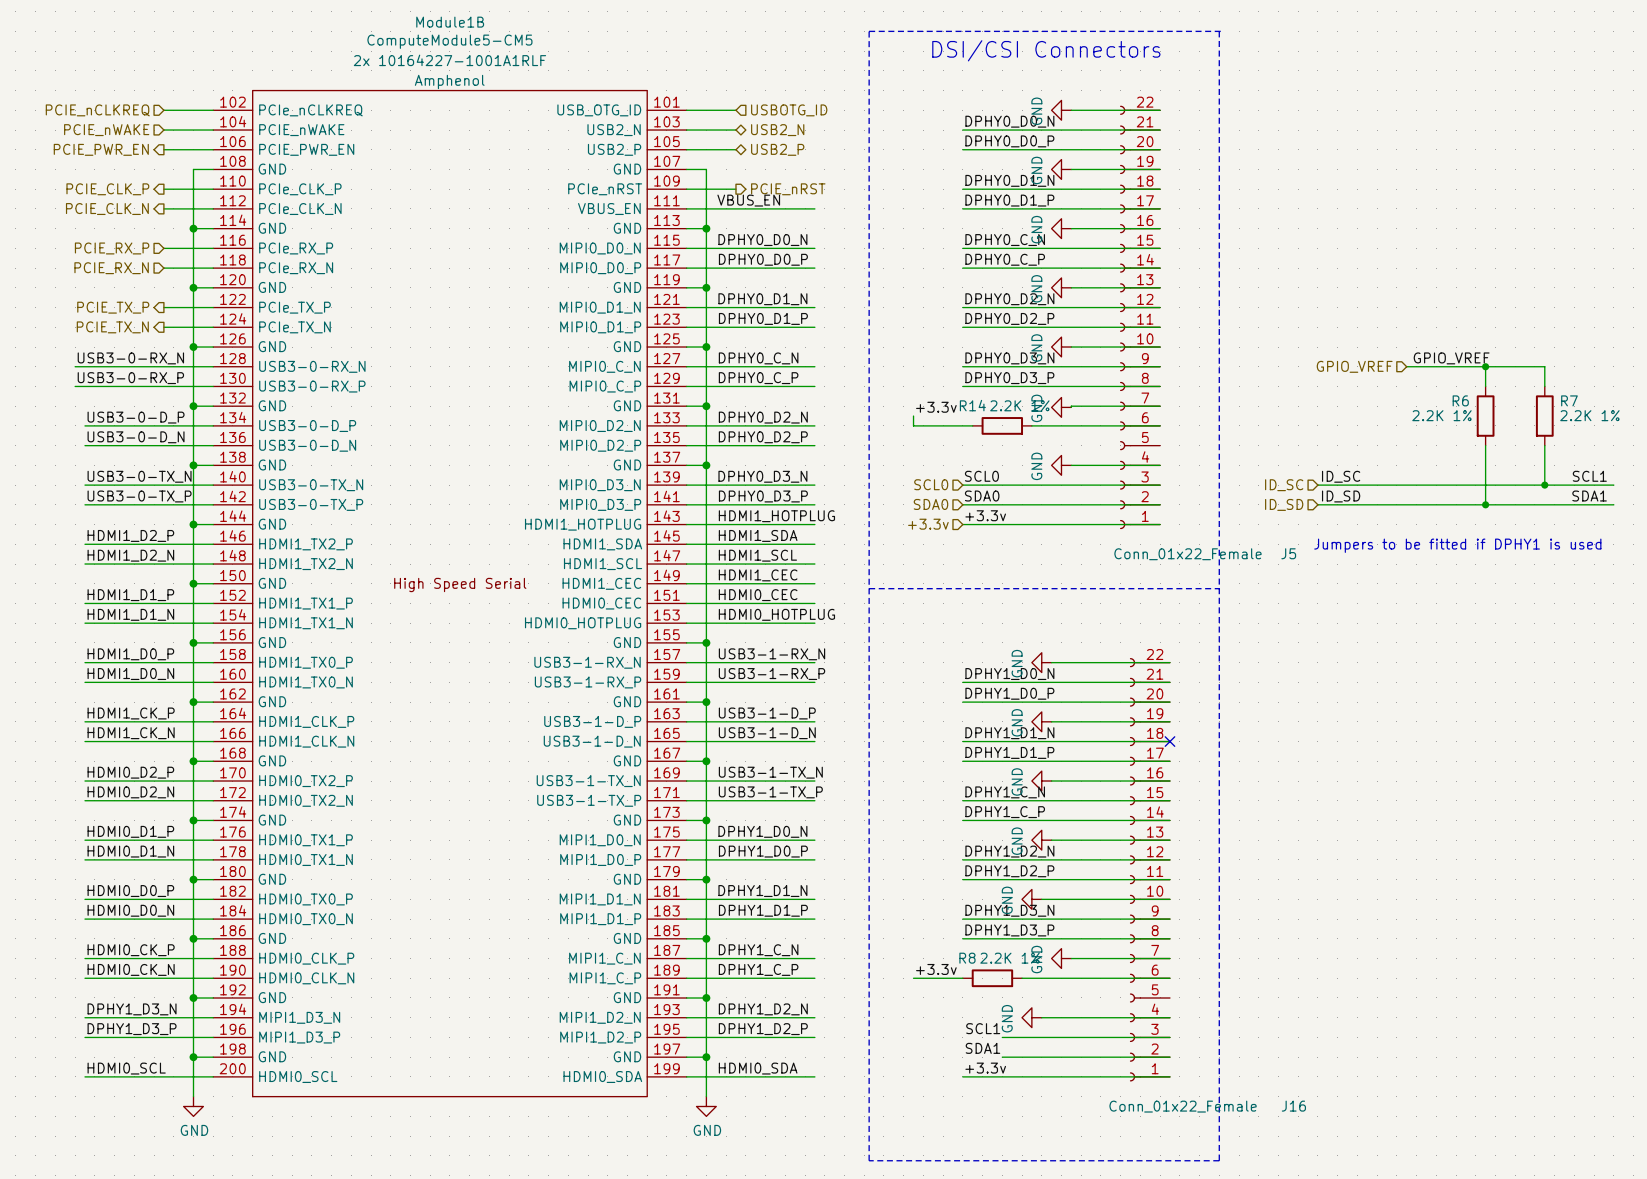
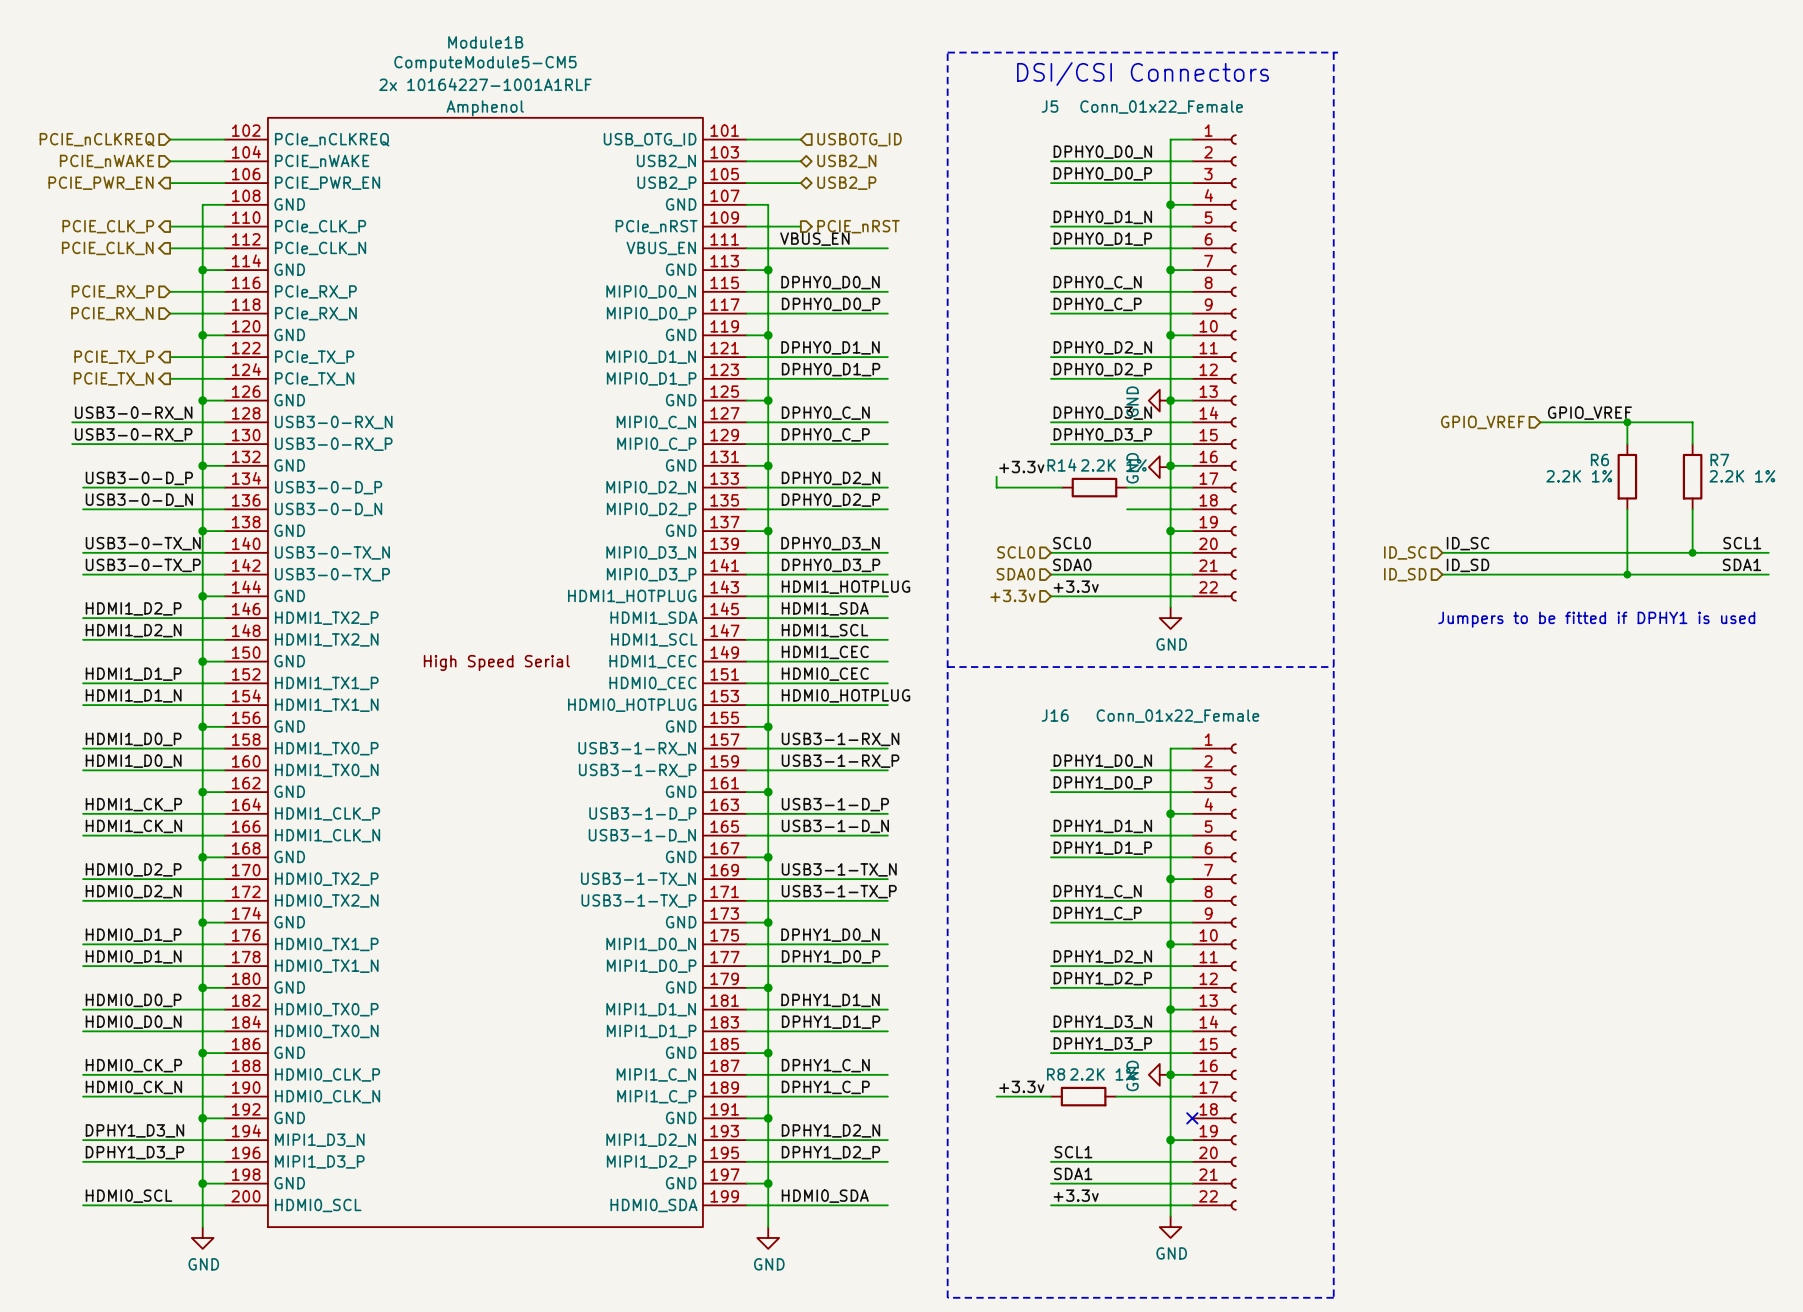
power symbol: GND (1061, 110) -> none
wire: none -> (1170, 139) (1170, 465)
power symbol: GND (1061, 169) -> none
junction: none -> (1170, 204)
power symbol: GND (1061, 228) -> none
junction: none -> (1170, 270)
power symbol: GND (1061, 287) -> none
junction: none -> (1170, 335)
J5 rotation: 0° (1125, 317) -> 180° (1230, 367)
junction: none -> (1170, 400)
junction: none -> (1170, 465)
wire: none -> (1170, 467) (1170, 607)
wire: none -> (1127, 509) (1192, 509)
power symbol: GND (1061, 465) -> none
junction: none -> (1170, 531)
power symbol: none -> GND (1170, 618)
power symbol: GND (1041, 662) -> none
wire: (1051, 662) (1071, 662) -> (1170, 1216) (1170, 748)
wire: (1091, 662) (1169, 662) -> none
wire: (1091, 682) (1169, 682) -> none
wire: (1091, 702) (1169, 702) -> none
power symbol: GND (1041, 721) -> none
wire: (1051, 721) (1071, 721) -> none
junction: none -> (1170, 813)
wire: (1091, 721) (1169, 721) -> none
wire: (1091, 741) (1169, 741) -> none
no-connect mark: (1169, 741) -> none
wire: (1091, 761) (1169, 761) -> none
power symbol: GND (1041, 781) -> none
wire: (1051, 781) (1071, 781) -> none
junction: none -> (1170, 879)
wire: (1091, 781) (1169, 781) -> none
wire: (1091, 800) (1169, 800) -> none
wire: (1091, 820) (1169, 820) -> none
power symbol: GND (1041, 840) -> none
wire: (1051, 840) (1071, 840) -> none
junction: none -> (1170, 944)
wire: (1091, 840) (1169, 840) -> none
wire: (1091, 859) (1169, 859) -> none
J16 rotation: 0° (1135, 869) -> 180° (1230, 976)
wire: (1091, 879) (1169, 879) -> none
power symbol: GND (1031, 899) -> none
wire: (1041, 899) (1071, 899) -> none
junction: none -> (1170, 1009)
wire: (1091, 899) (1169, 899) -> none
wire: (1091, 919) (1169, 919) -> none
wire: (1091, 938) (1169, 938) -> none
junction: none -> (1170, 1074)
wire: (1091, 958) (1169, 958) -> none
wire: (1091, 978) (1169, 978) -> none
no-connect mark: none -> (1192, 1118)
power symbol rotation: 0° (1031, 1017) -> 90° counterclockwise (1170, 1227)
power symbol position: GND (1031, 1017) -> GND (1170, 1227)
wire: (1041, 1017) (1071, 1017) -> none
junction: none -> (1170, 1140)
wire: (1091, 1017) (1169, 1017) -> none
wire: none -> (1050, 1161) (1094, 1161)
wire: (1091, 1037) (1169, 1037) -> none
wire: none -> (1050, 1183) (1094, 1183)
wire: (1091, 1057) (1169, 1057) -> none
wire: (1091, 1076) (1169, 1076) -> none

